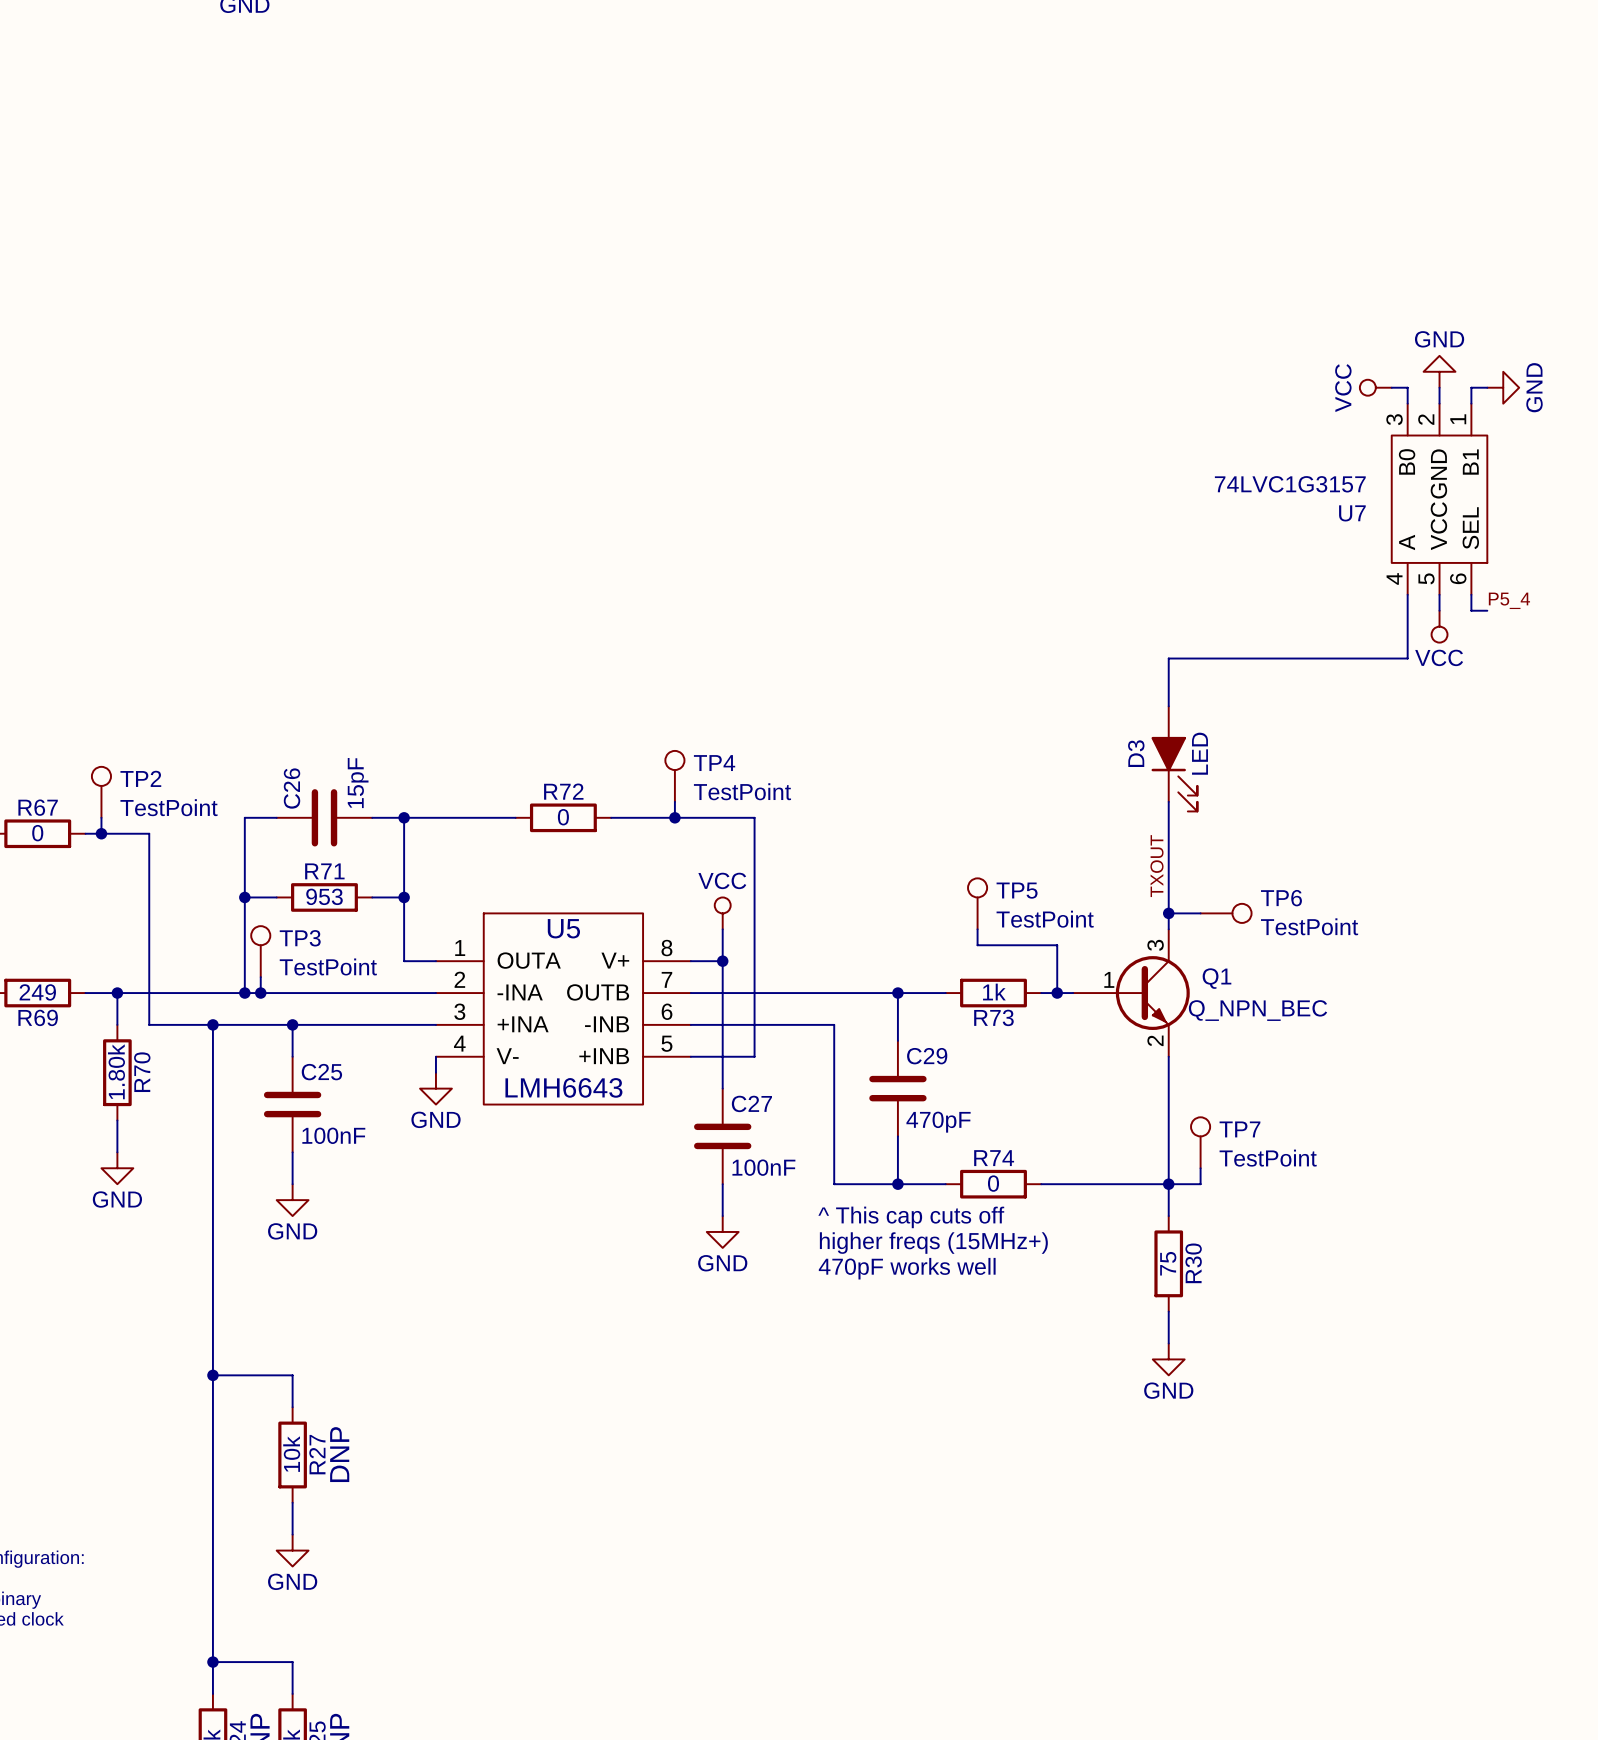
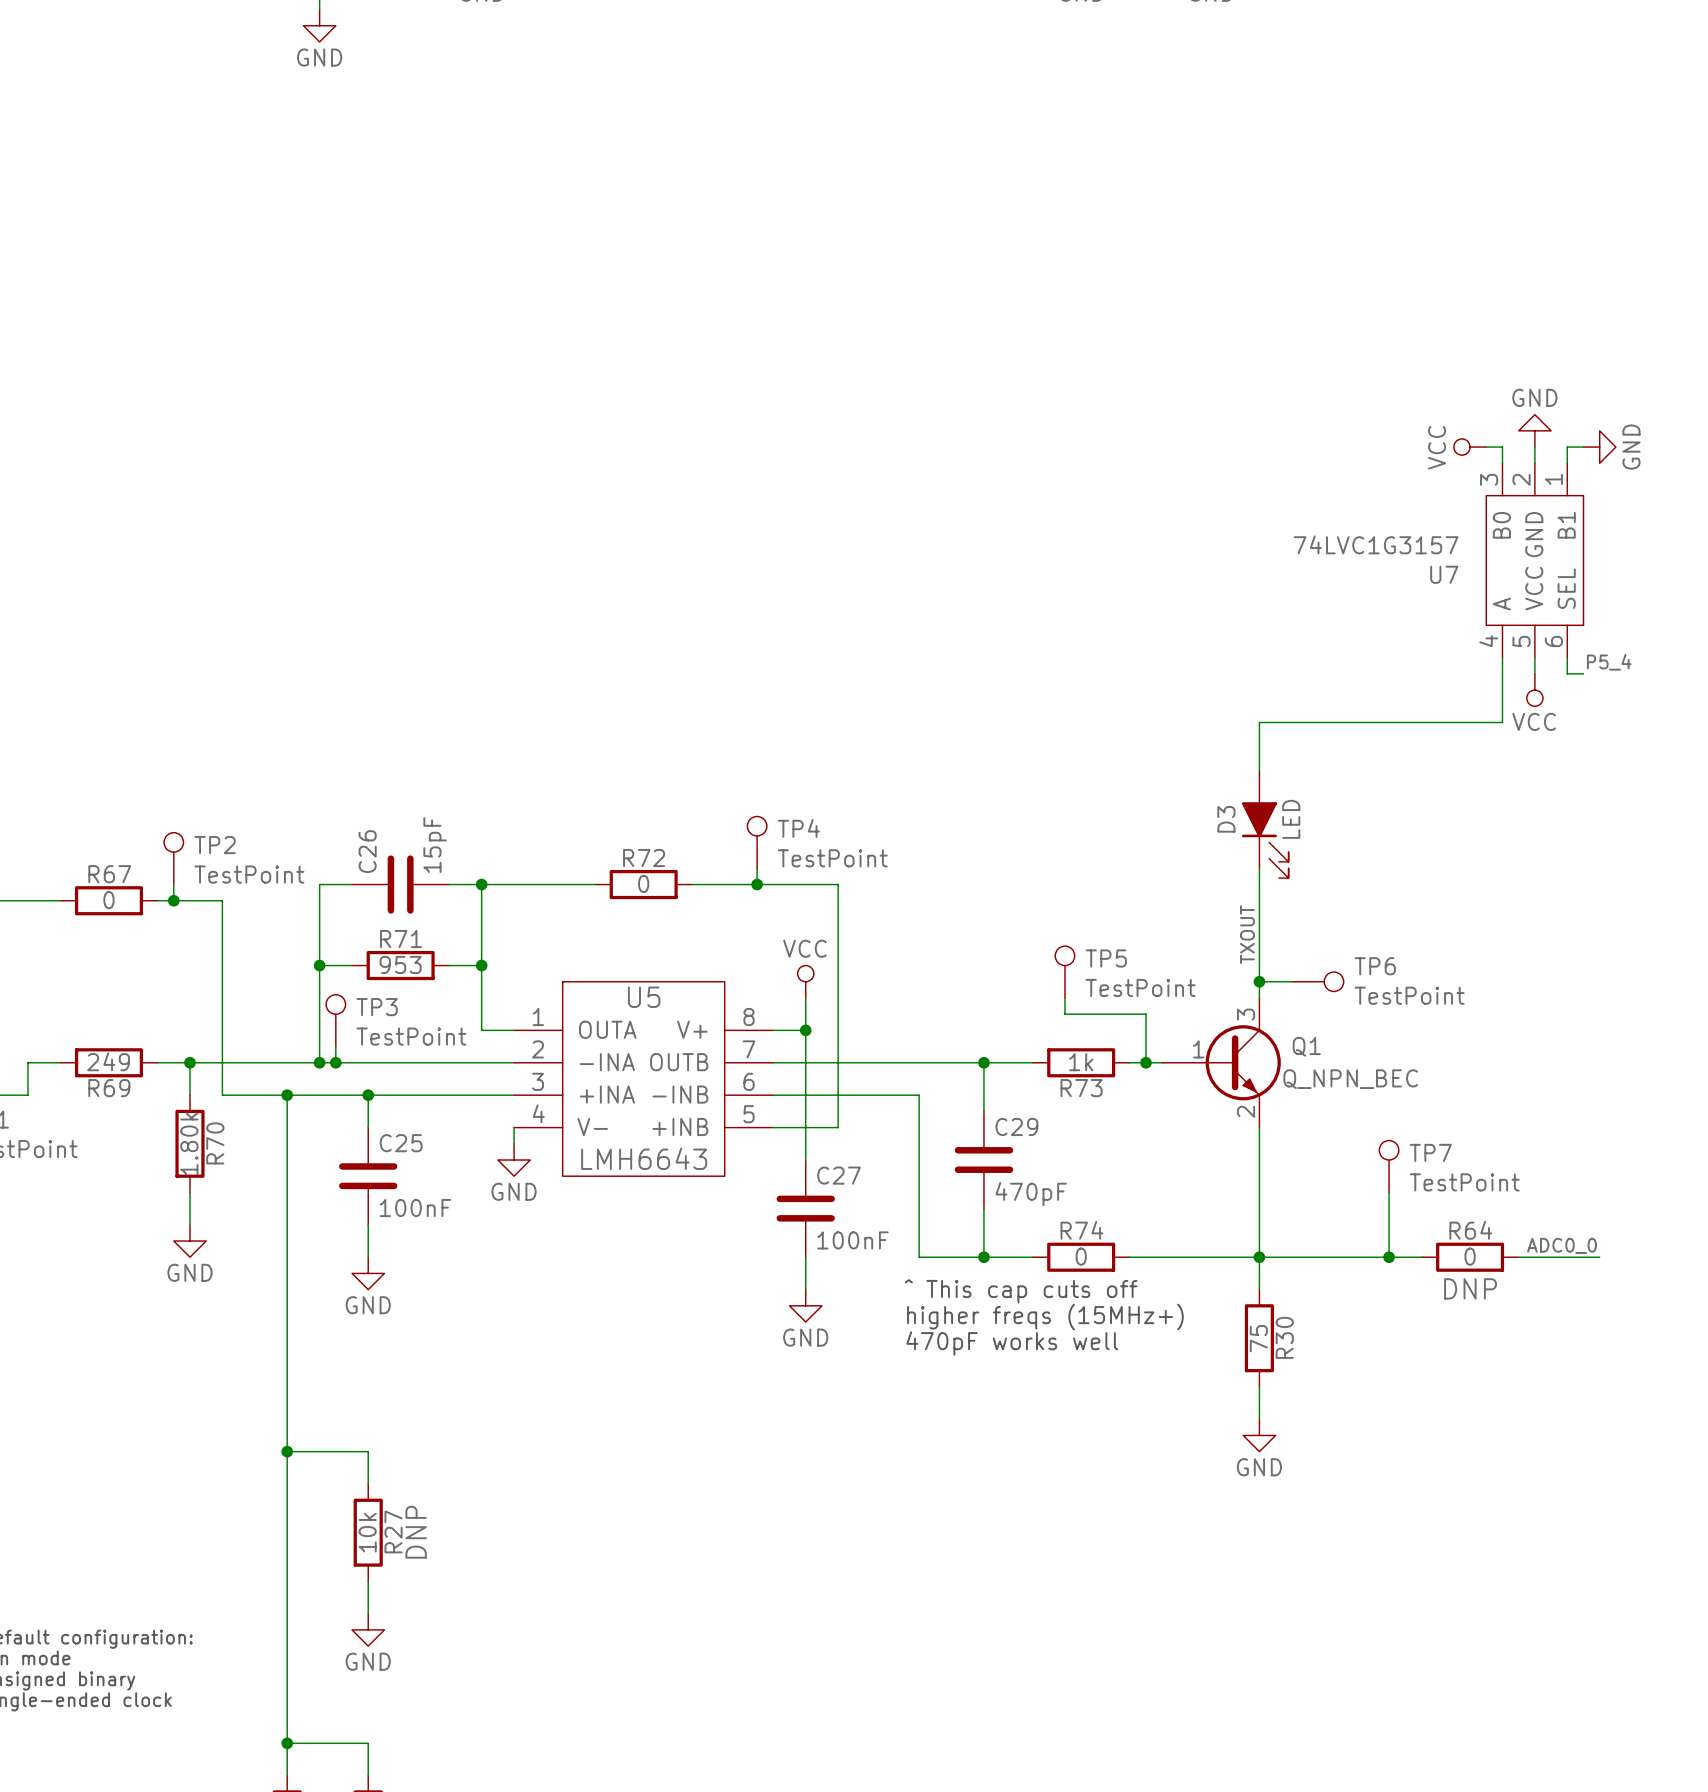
wire: none -> (1389, 1192) (1389, 1257)
TP7 position: (1200, 1142) -> (1389, 1166)
wire: (1200, 1168) (1200, 1184) -> (1421, 1257) (1291, 1257)
label: none -> ADC0_0 (1562, 1245)
junction: none -> (1389, 1257)
R64: none -> 0 (1470, 1257)
wire: none -> (1518, 1257) (1599, 1257)

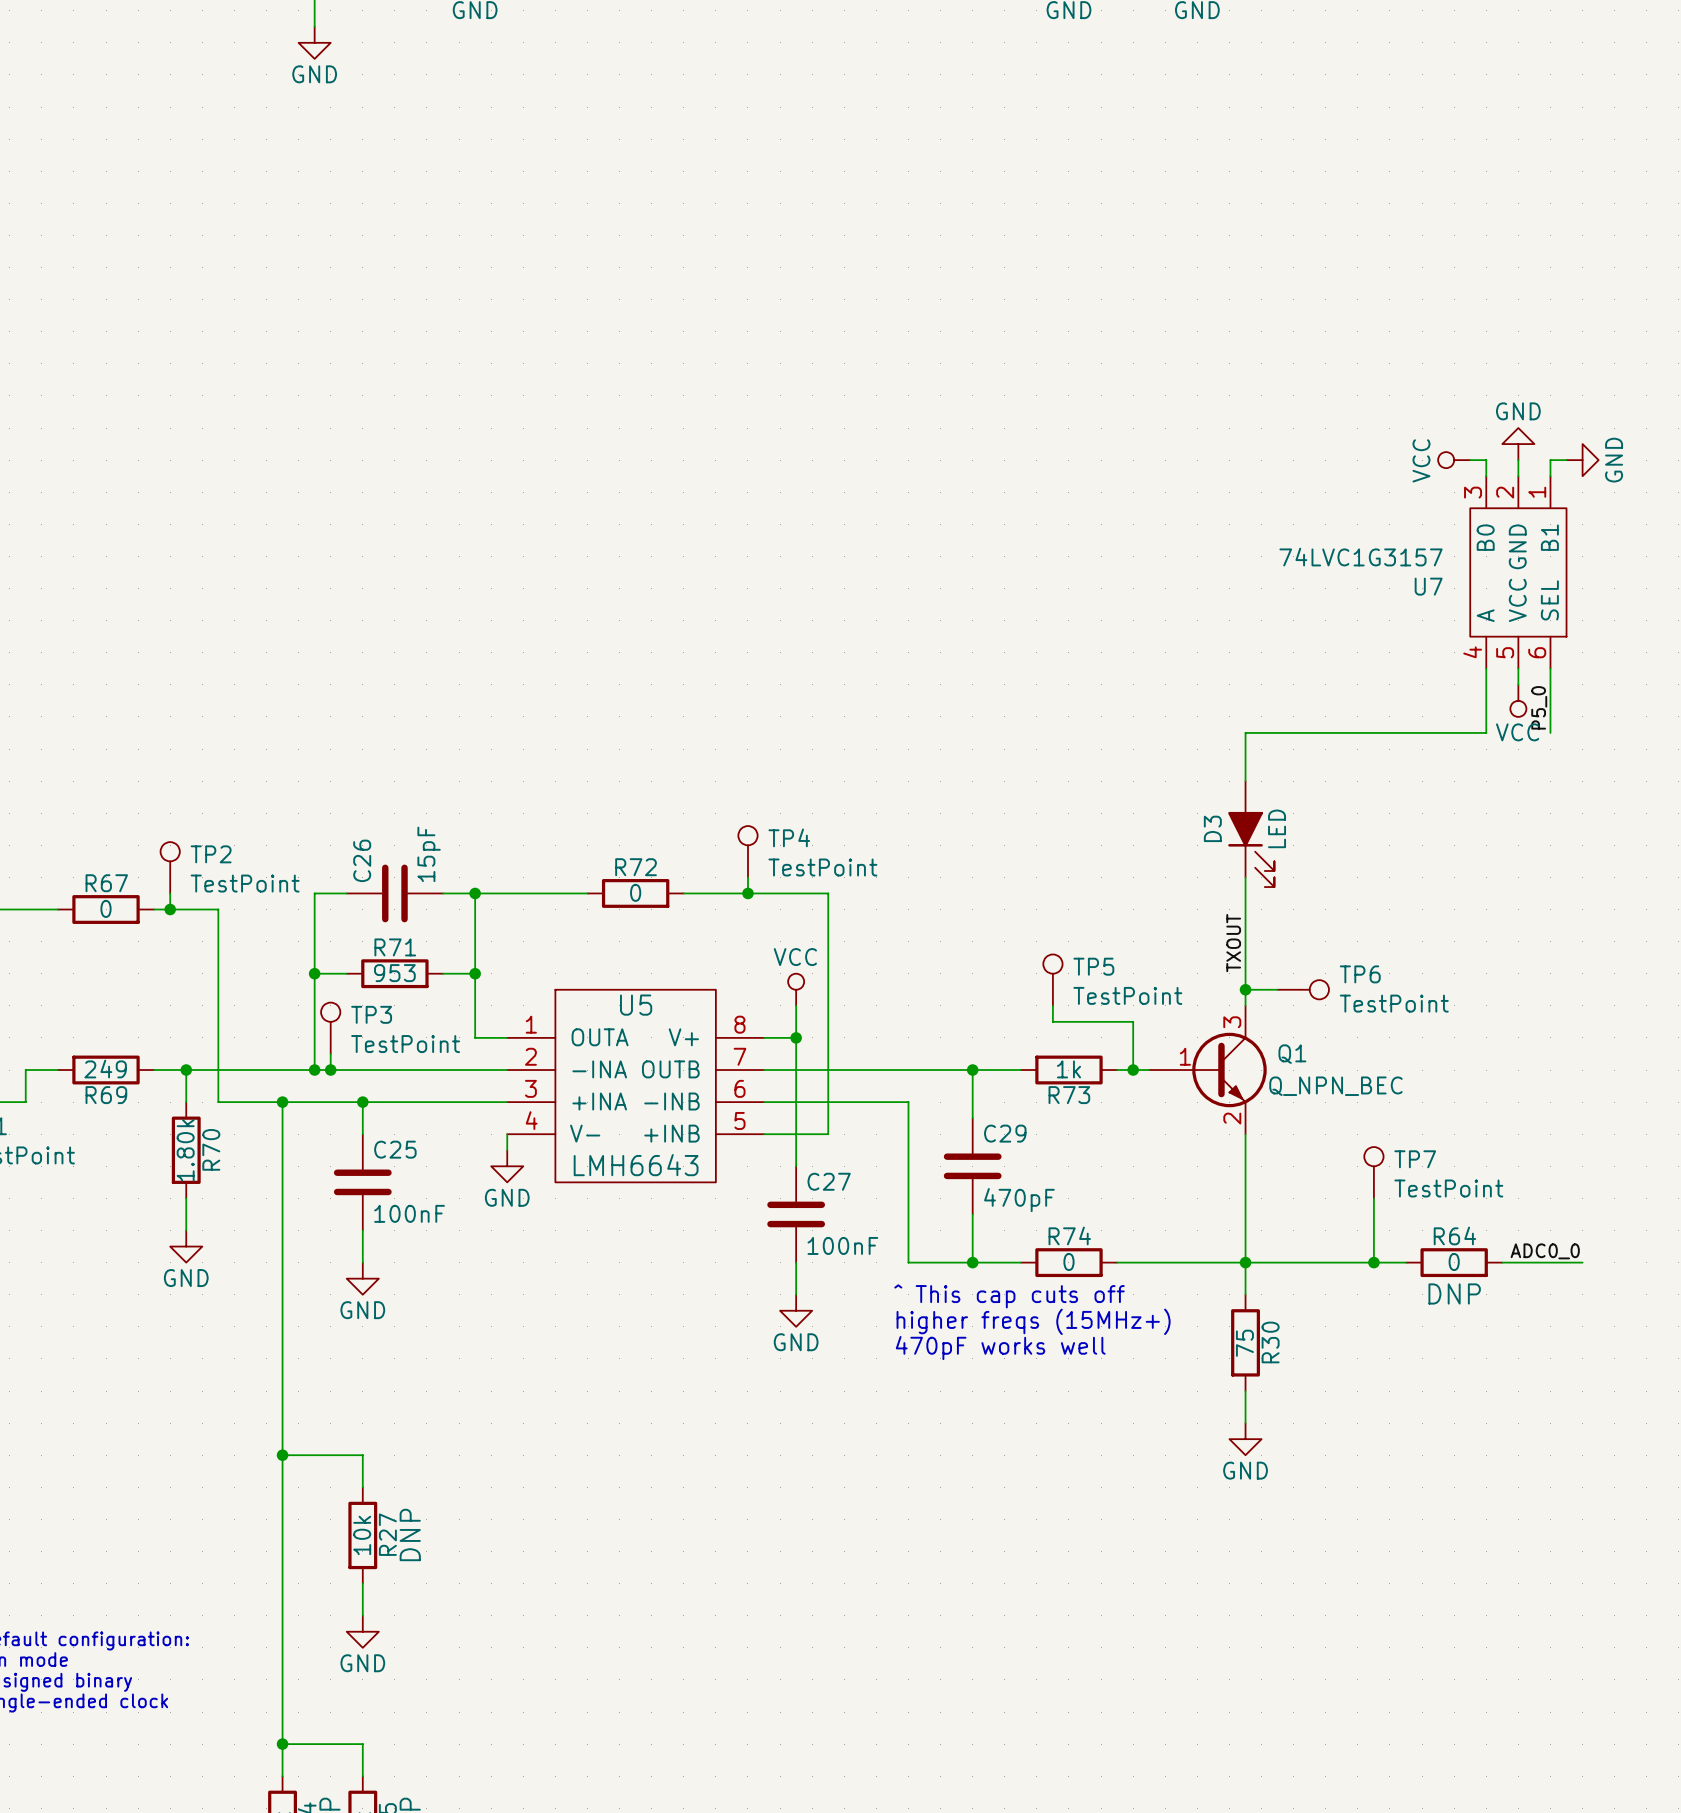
label: P5_4 (1609, 662) -> none
wire: (1567, 673) (1583, 673) -> (1550, 684) (1550, 732)
label: none -> P5_0 (1539, 707)

